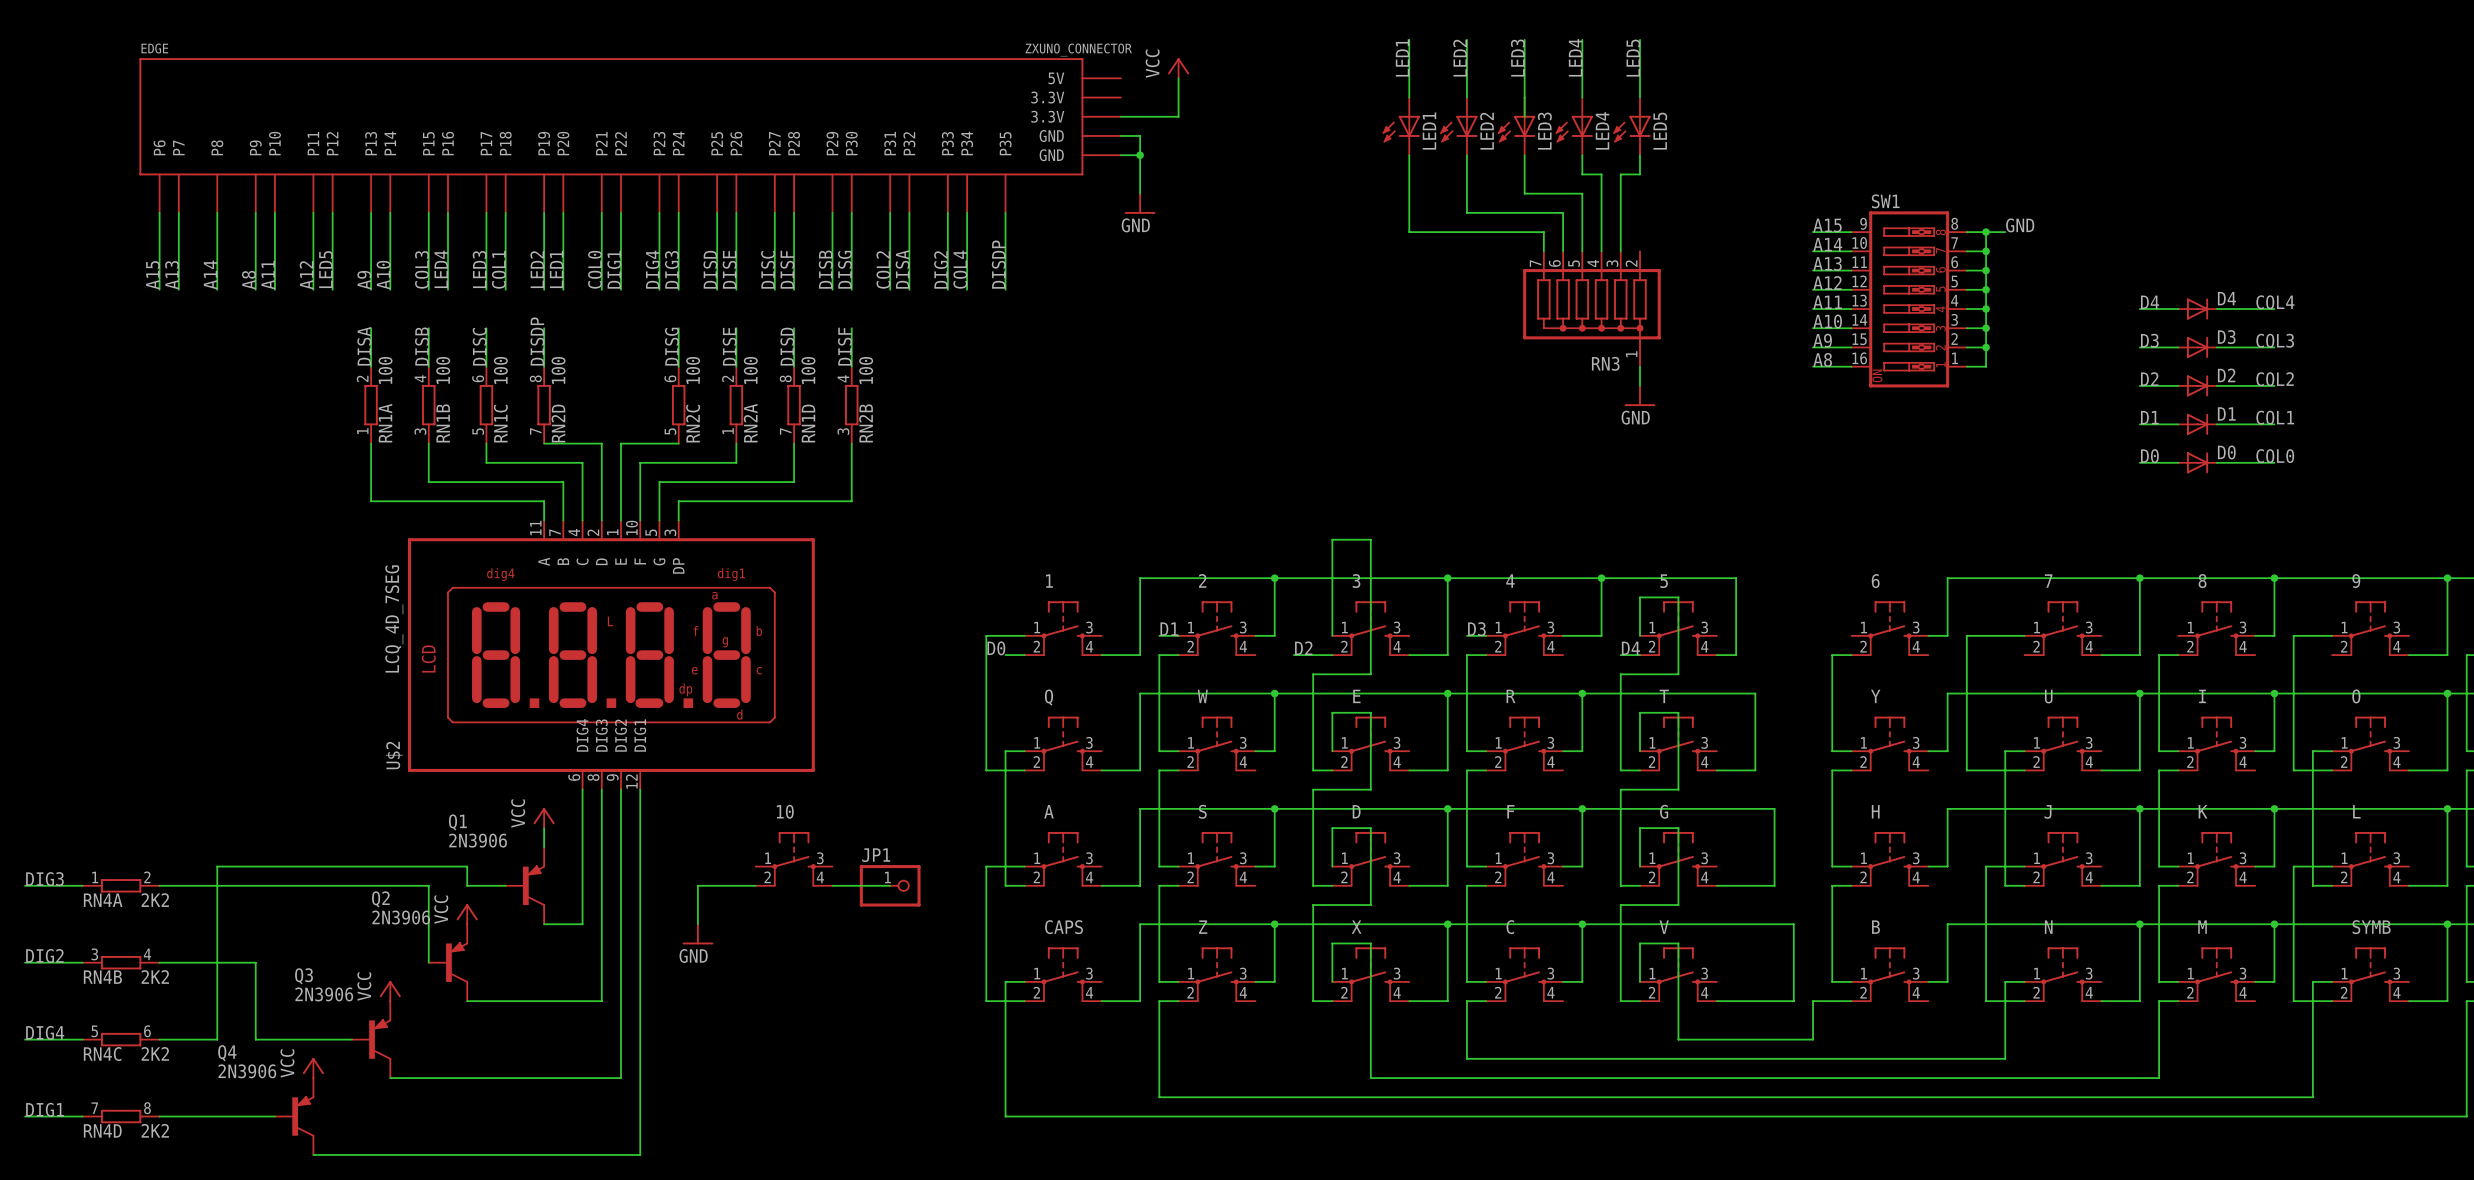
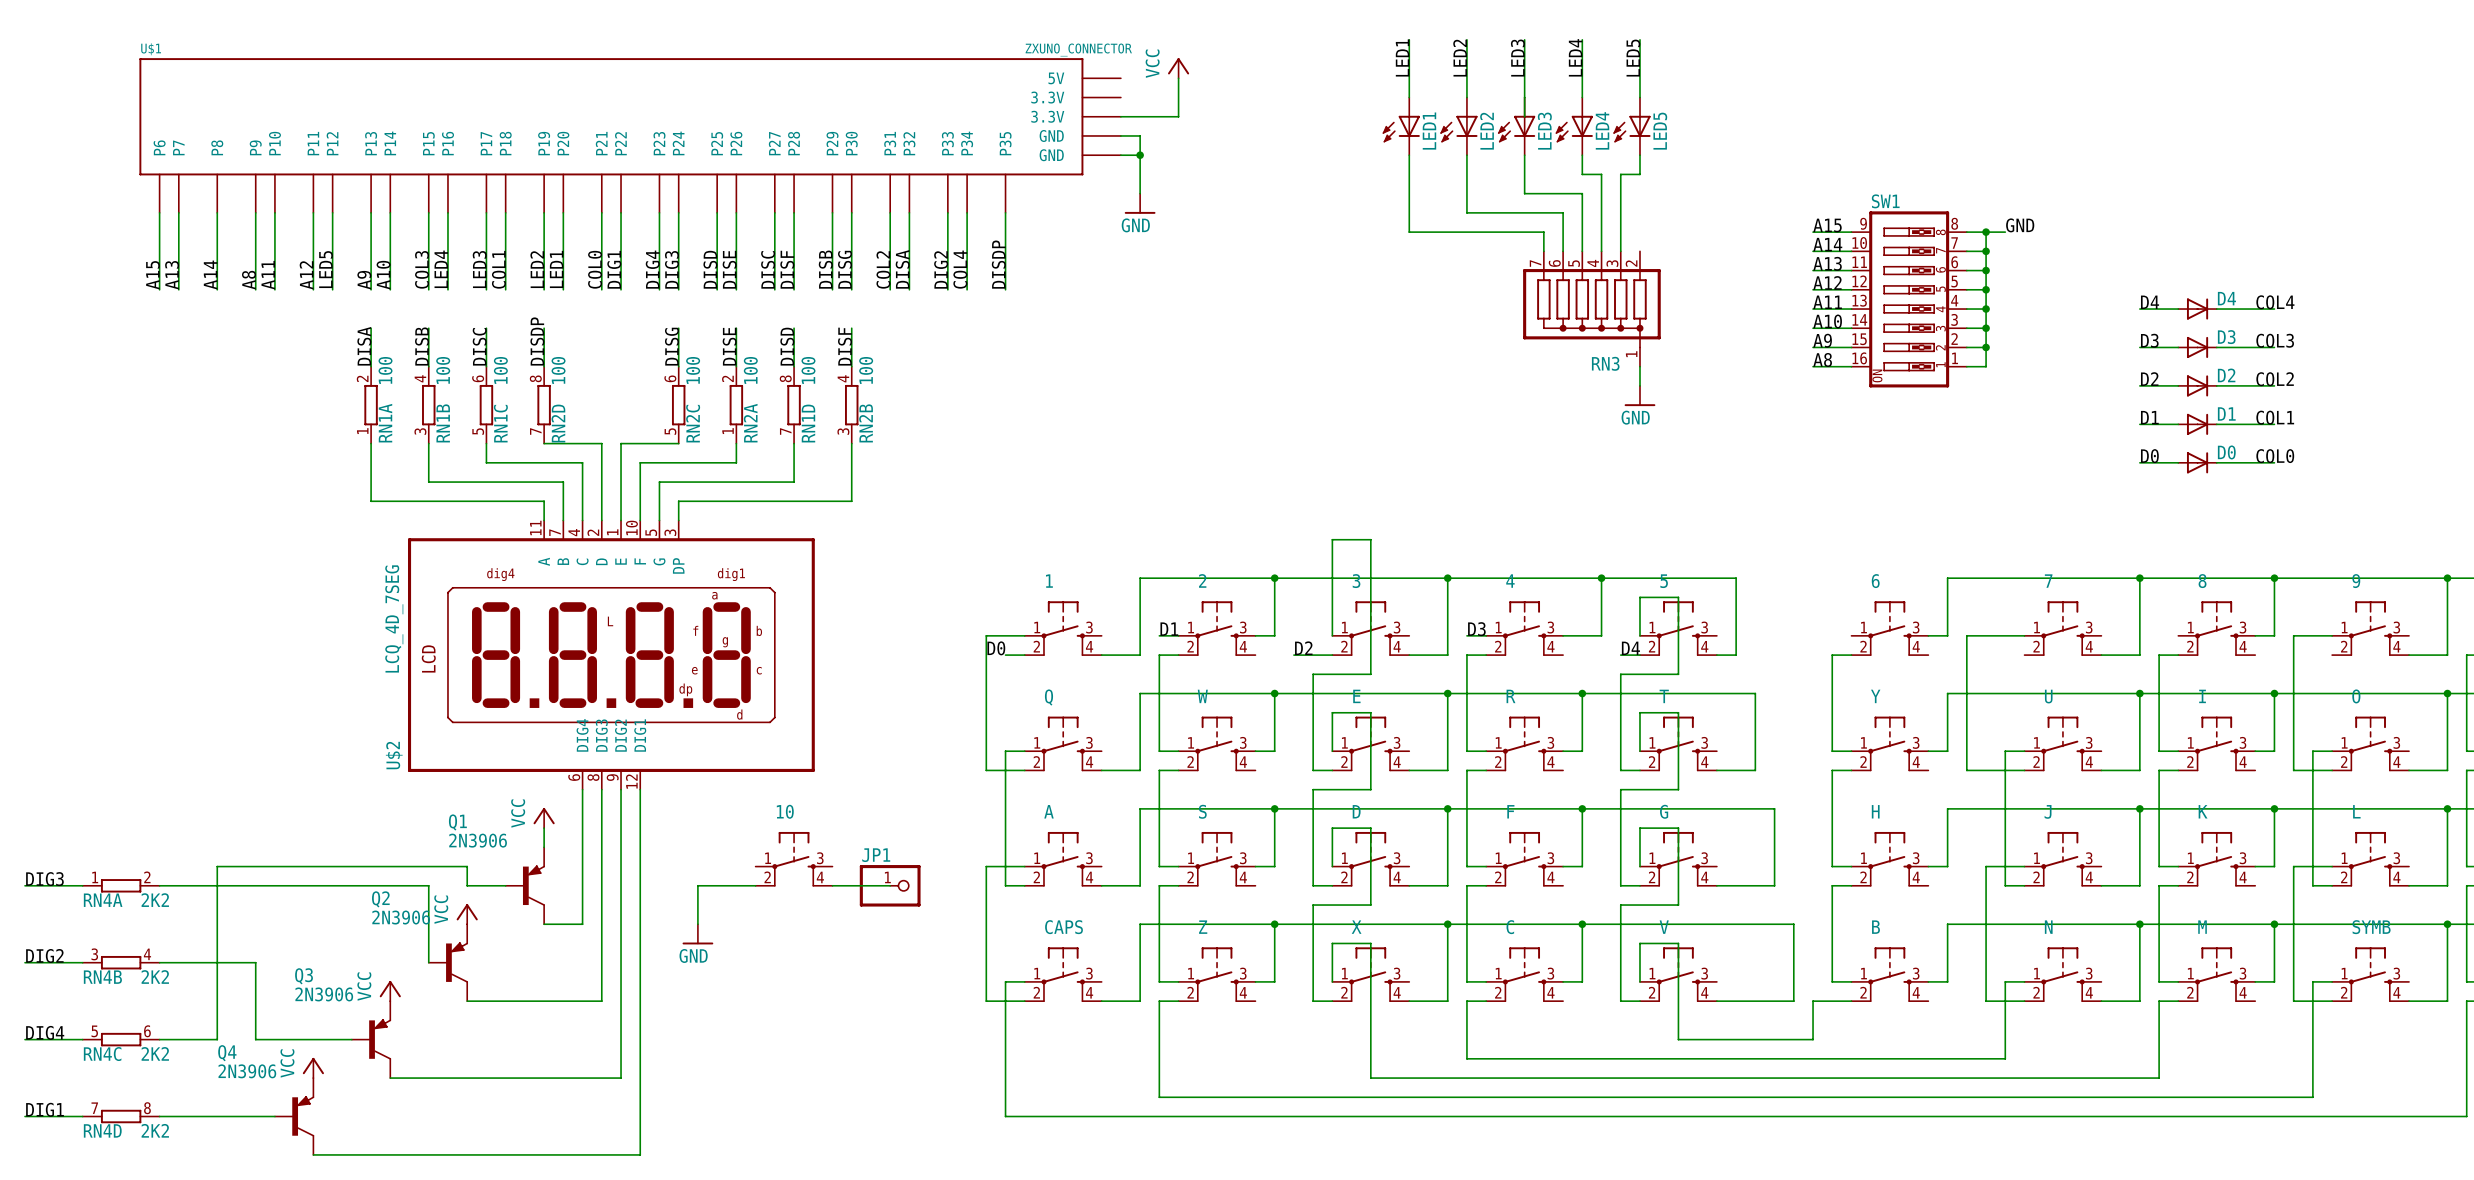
EDGE name: EDGE (154, 48) -> U$1 (151, 49)

